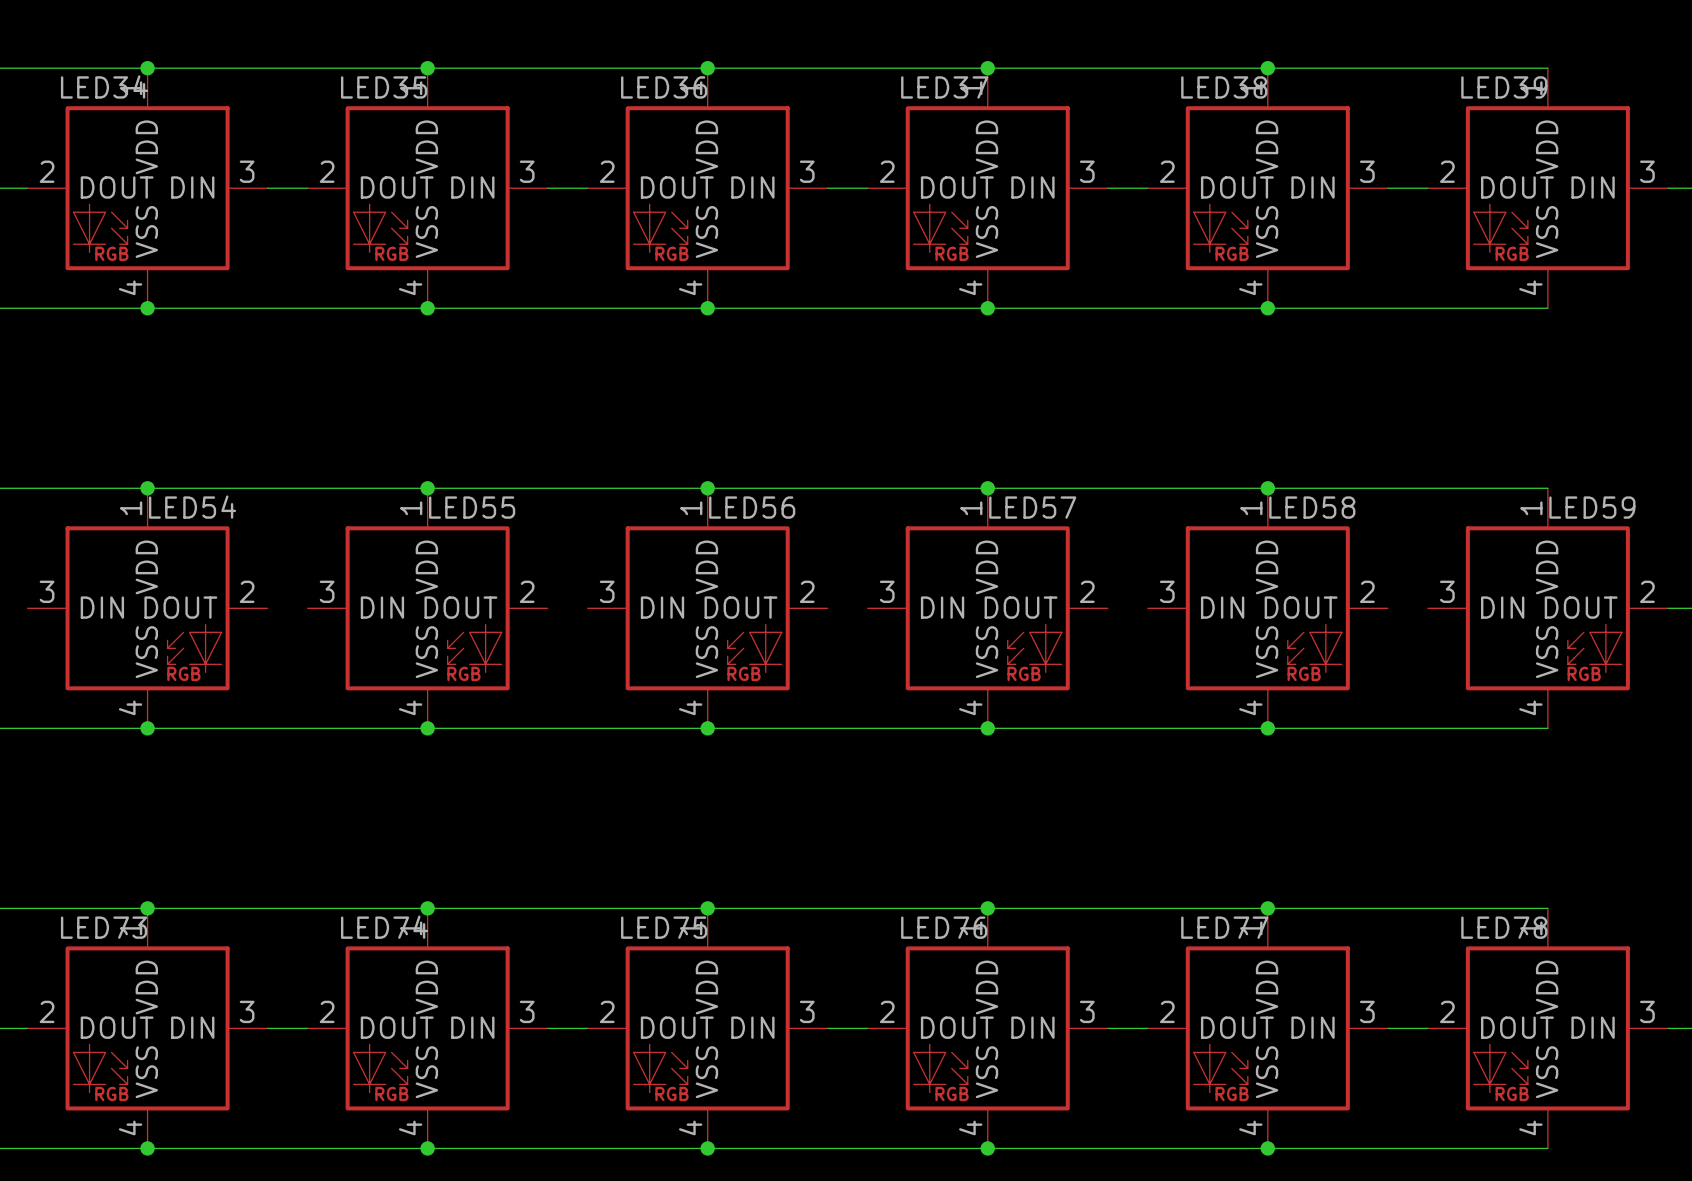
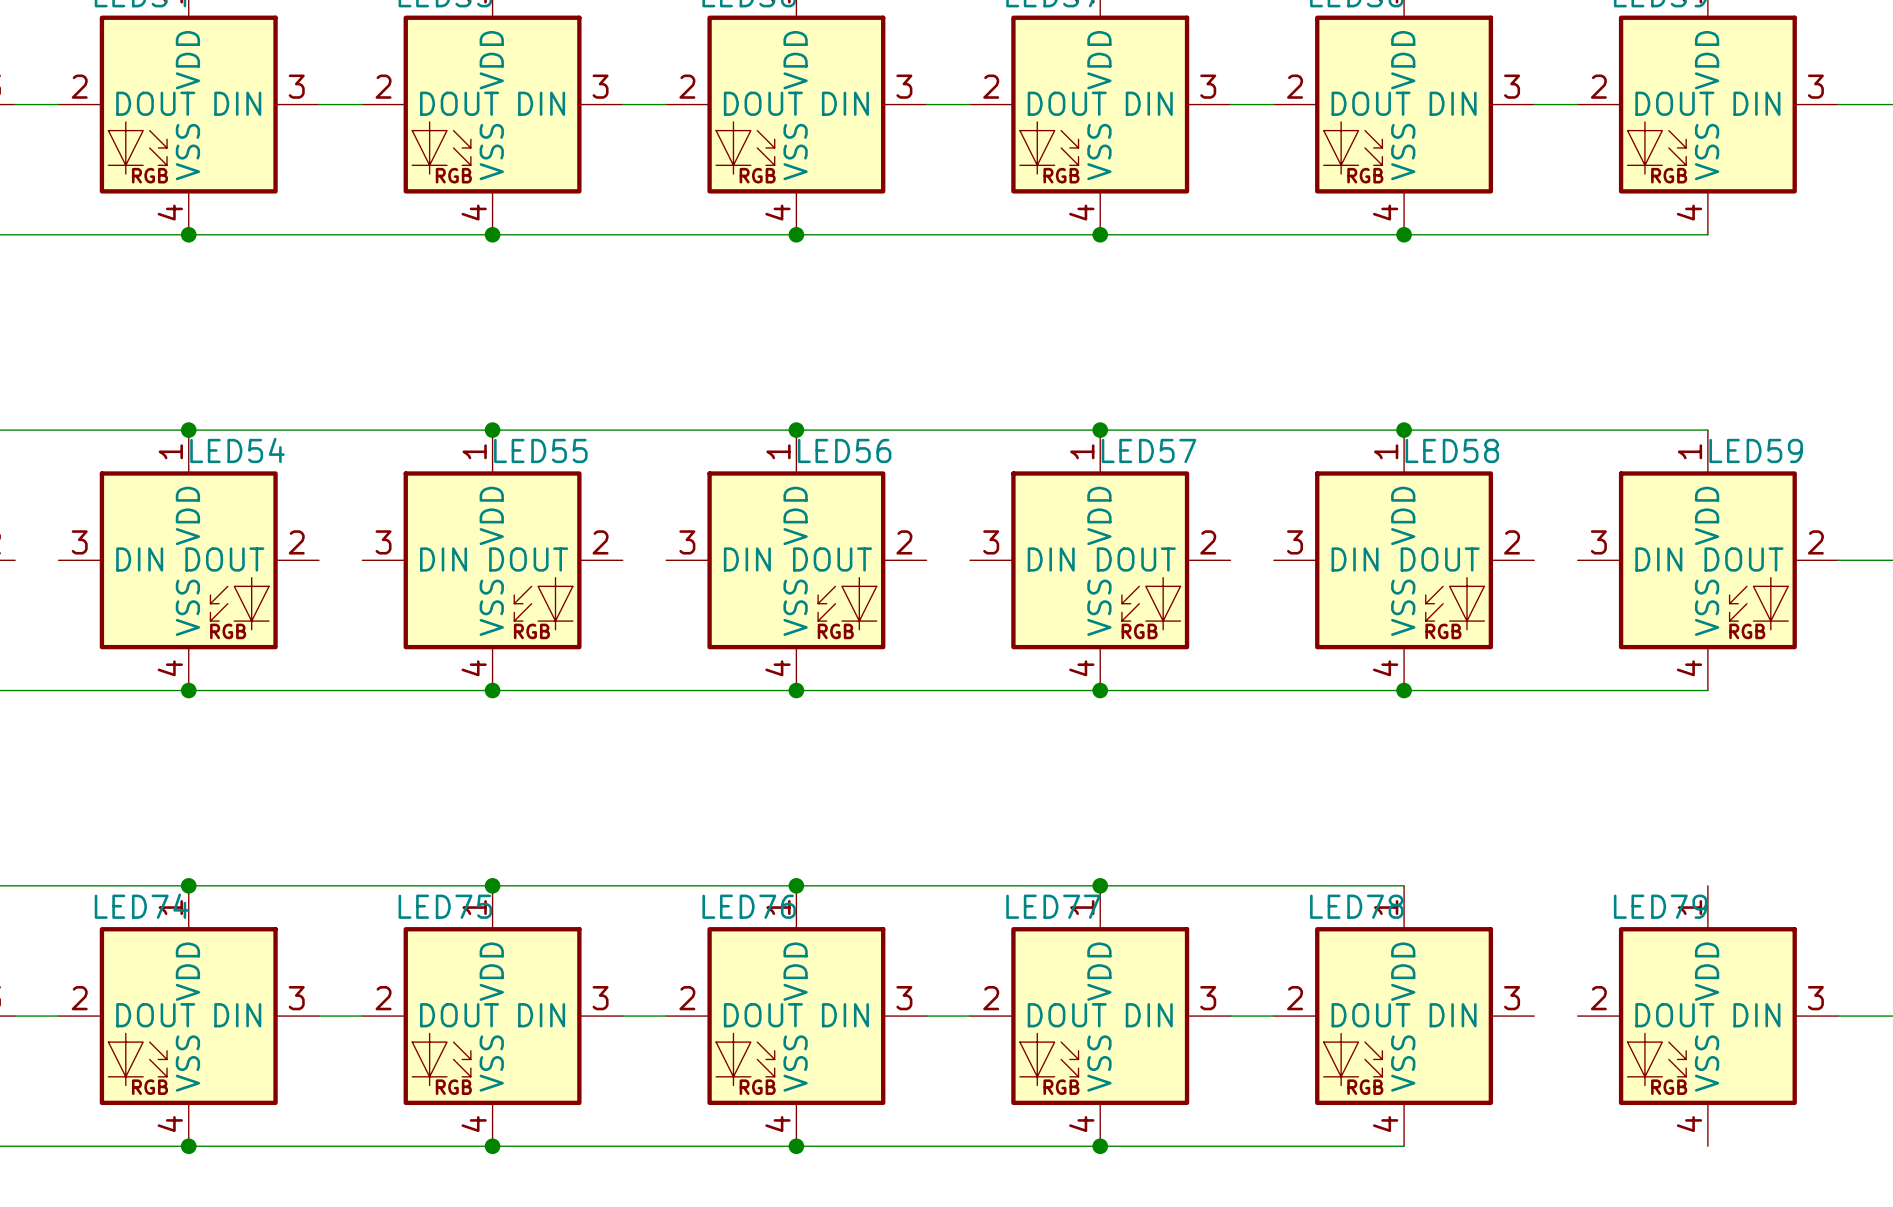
wire: (1267, 908) (1547, 908) -> none
junction: (1267, 908) -> none
LED73 name: LED73 (104, 927) -> LED74 (142, 906)
LED74 name: LED74 (384, 927) -> LED75 (445, 906)
LED75 name: LED75 (664, 927) -> LED76 (749, 906)
LED76 name: LED76 (944, 927) -> LED77 (1053, 906)
LED77 name: LED77 (1224, 927) -> LED78 (1356, 906)
LED78 name: LED78 (1504, 927) -> LED79 (1660, 906)
wire: (1387, 1028) (1427, 1028) -> none
wire: (1267, 1148) (1547, 1148) -> none
junction: (1267, 1148) -> none

